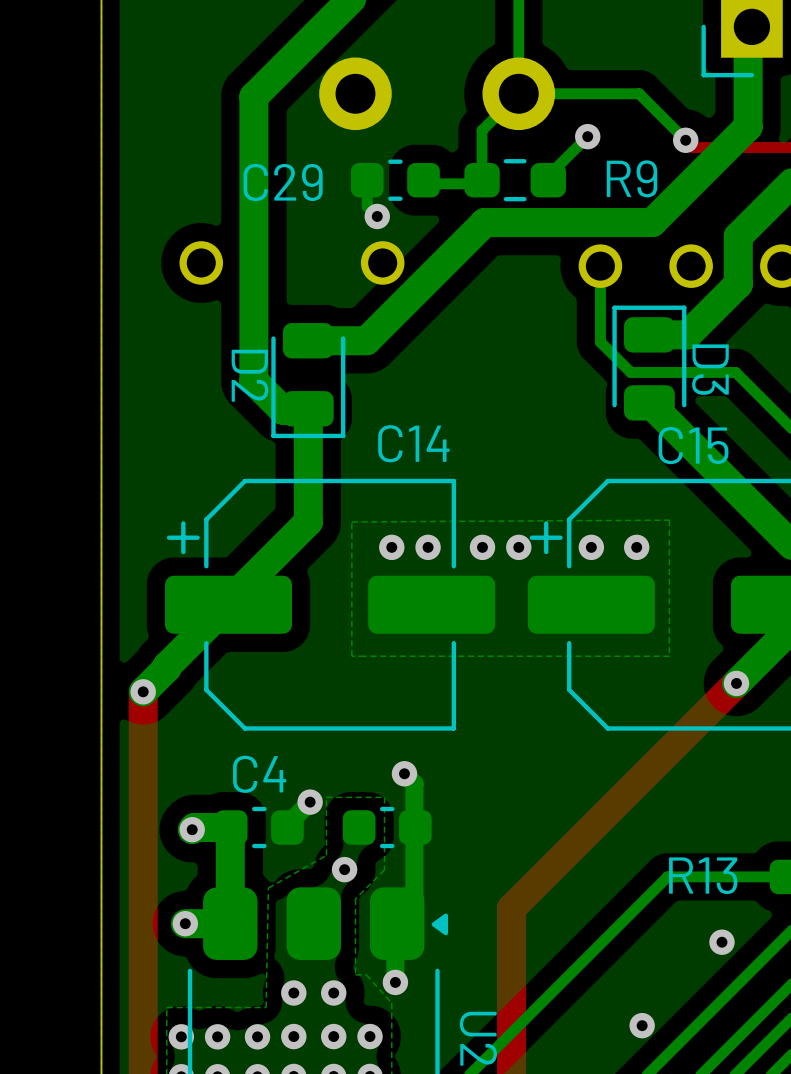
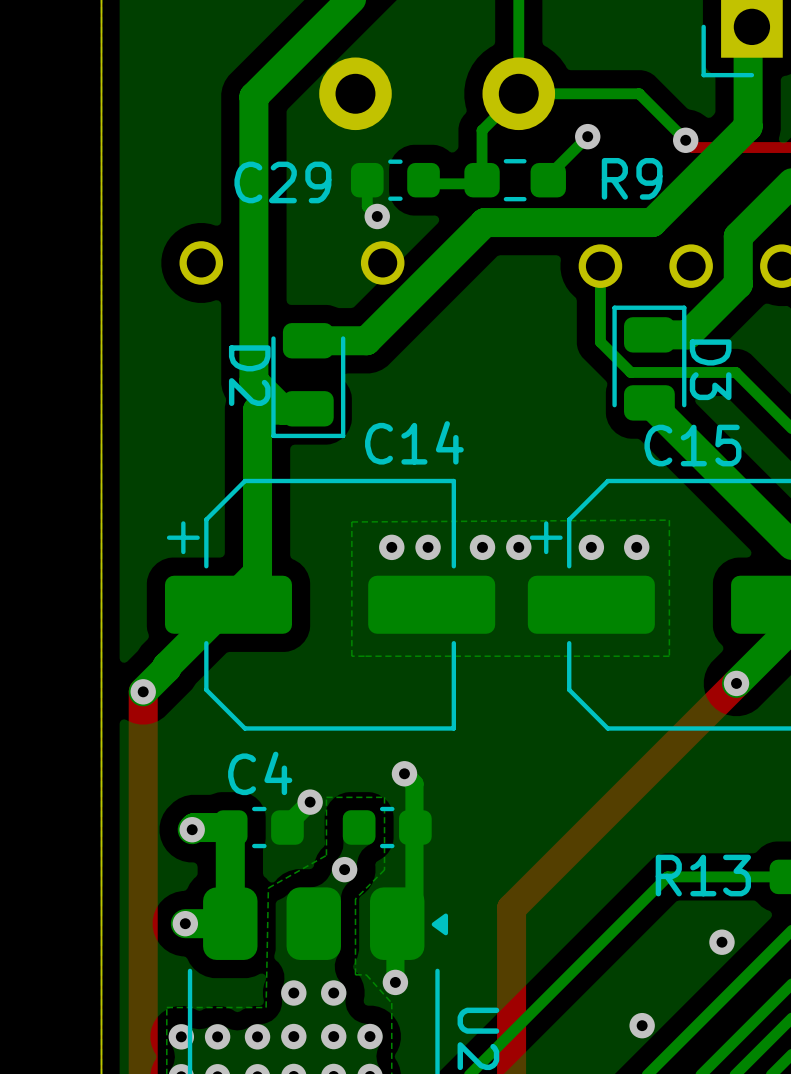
bottom track: (306, 410) (308, 521) (257, 572) -> (282, 410) (257, 410) (257, 572)

